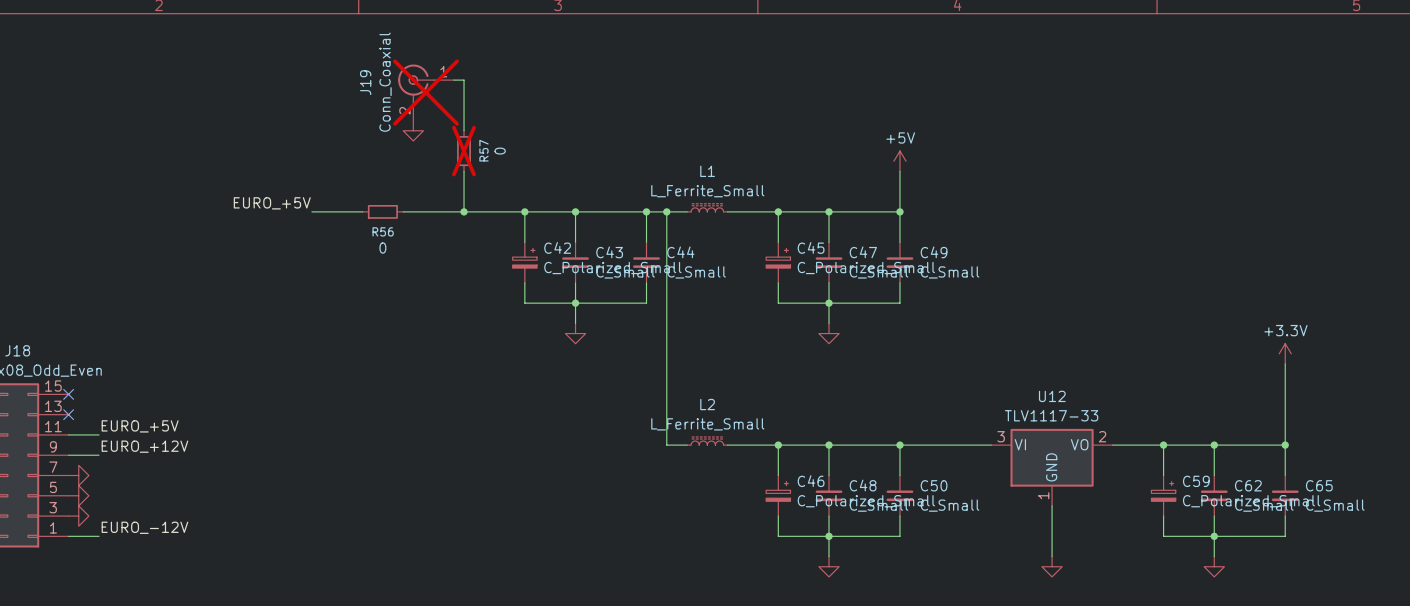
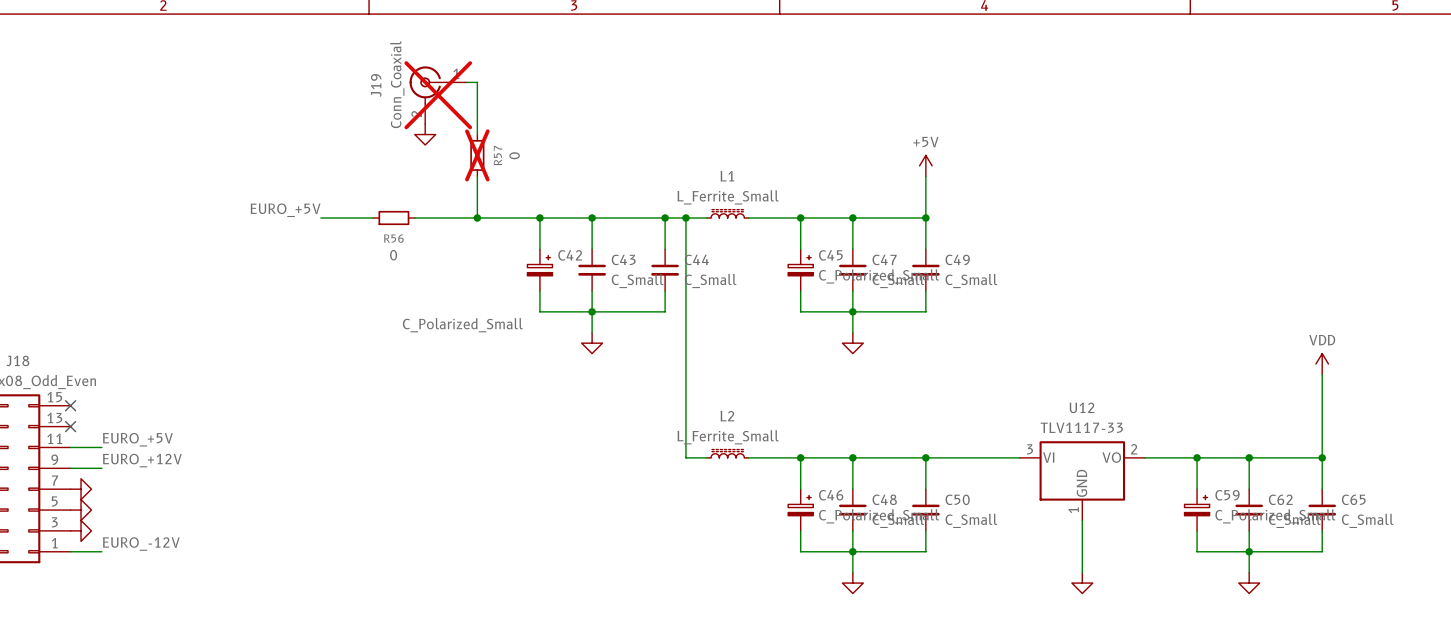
C42 value position: C_Polarized_Small (612, 268) -> C_Polarized_Small (462, 325)
power symbol: +3.3V (1285, 353) -> VDD (1322, 364)

